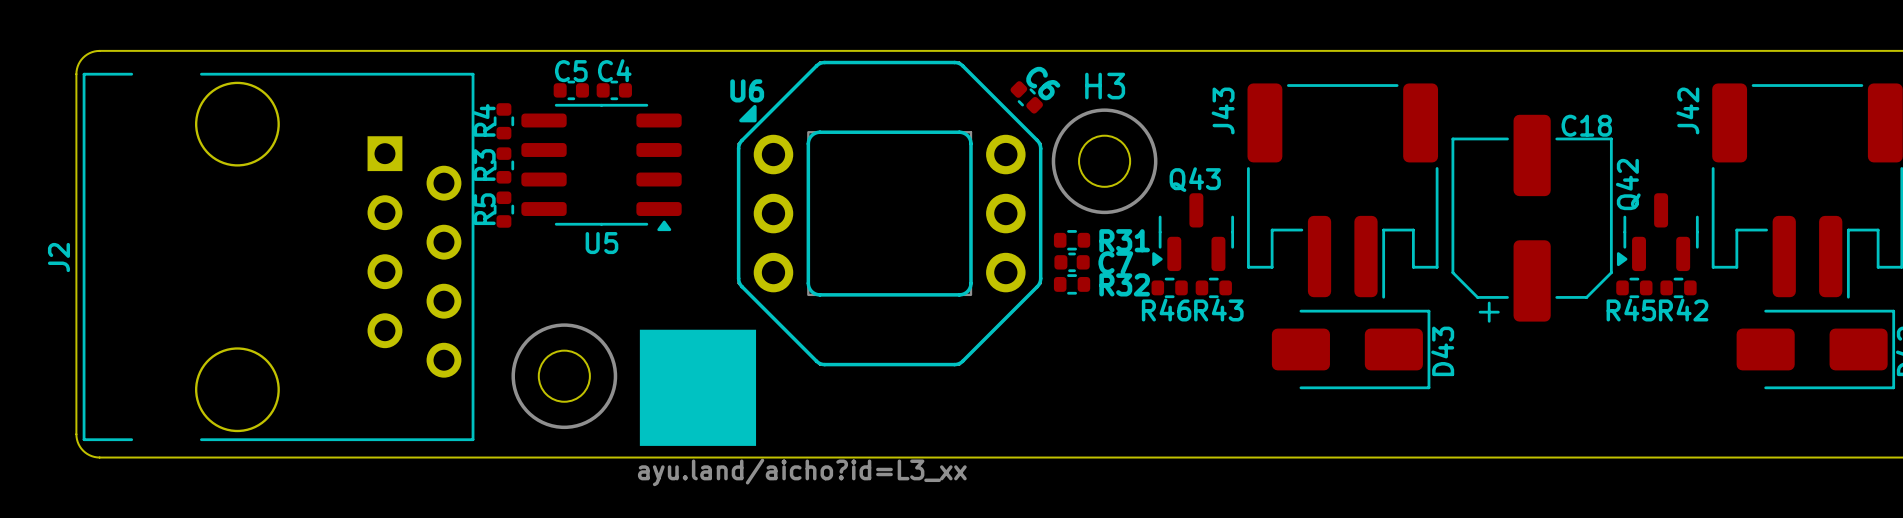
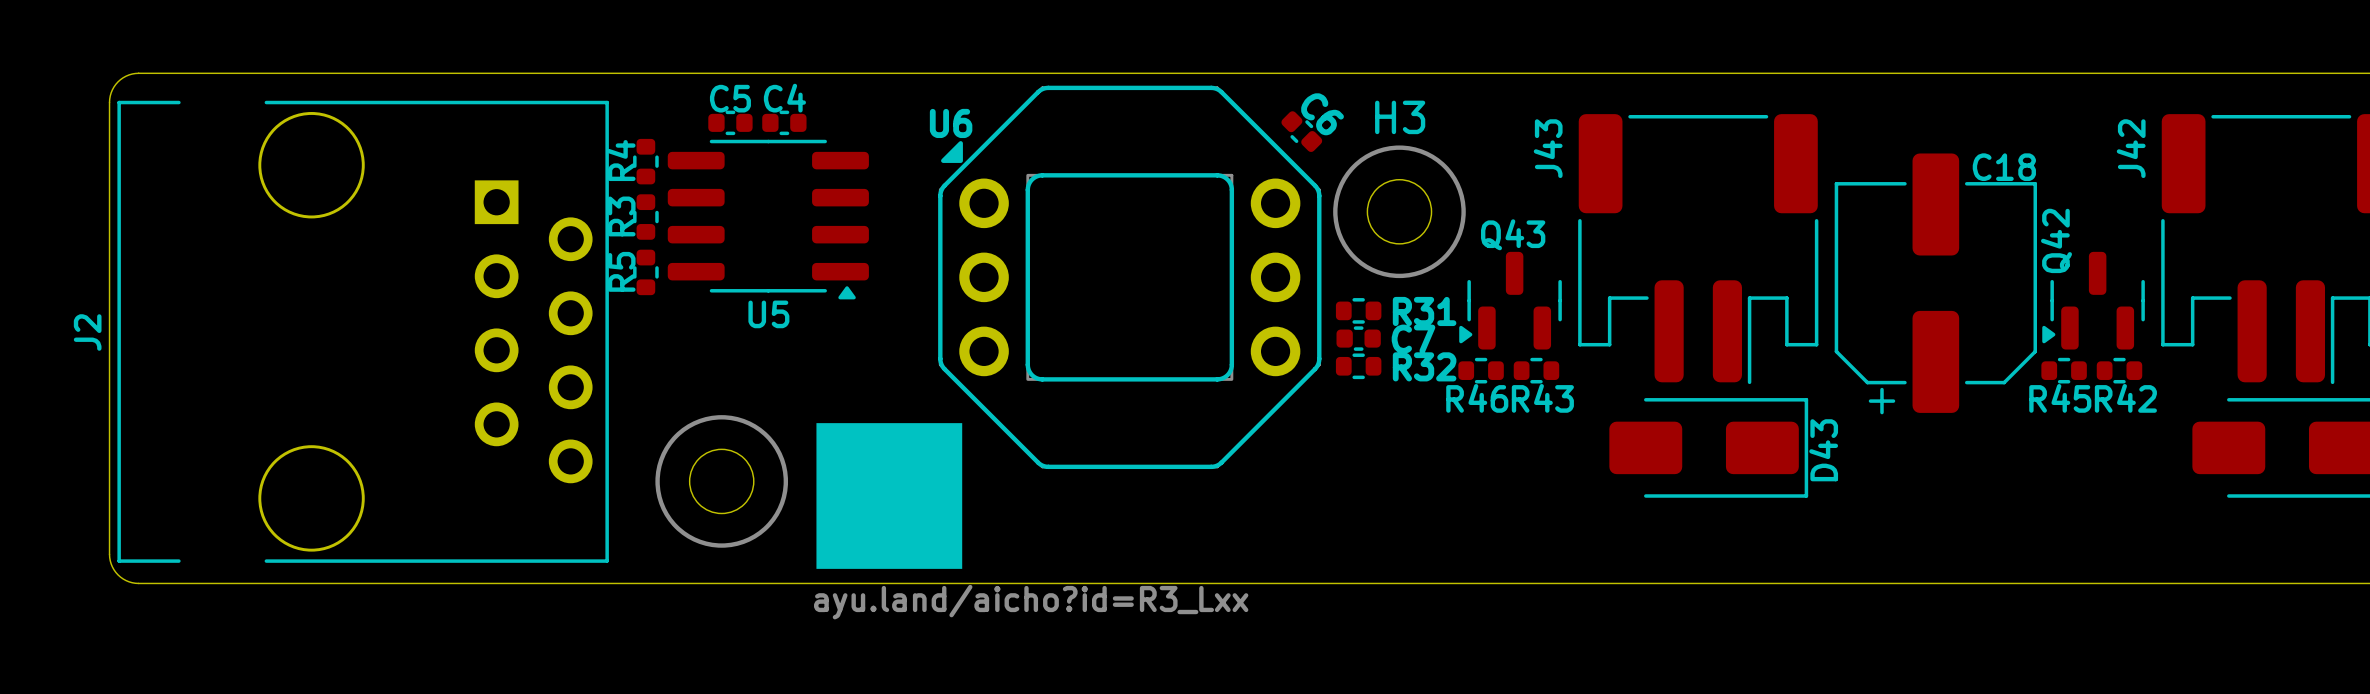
text: ayu.land/aicho?id=L3_xx (802, 472) -> ayu.land/aicho?id=R3_Lxx (1031, 602)

